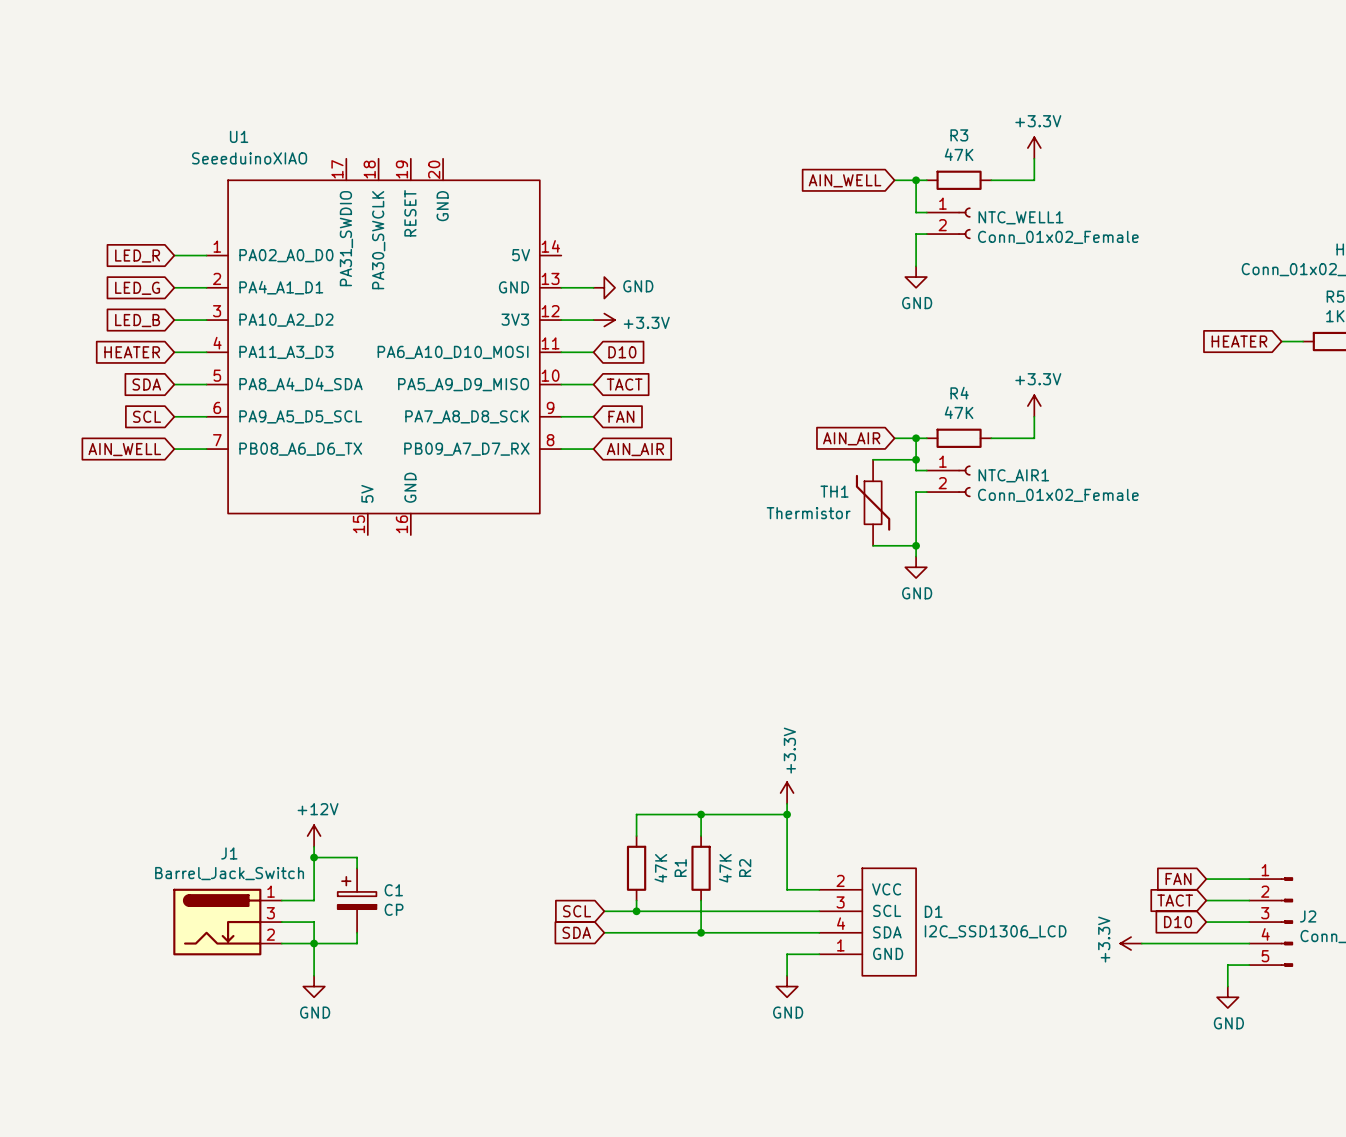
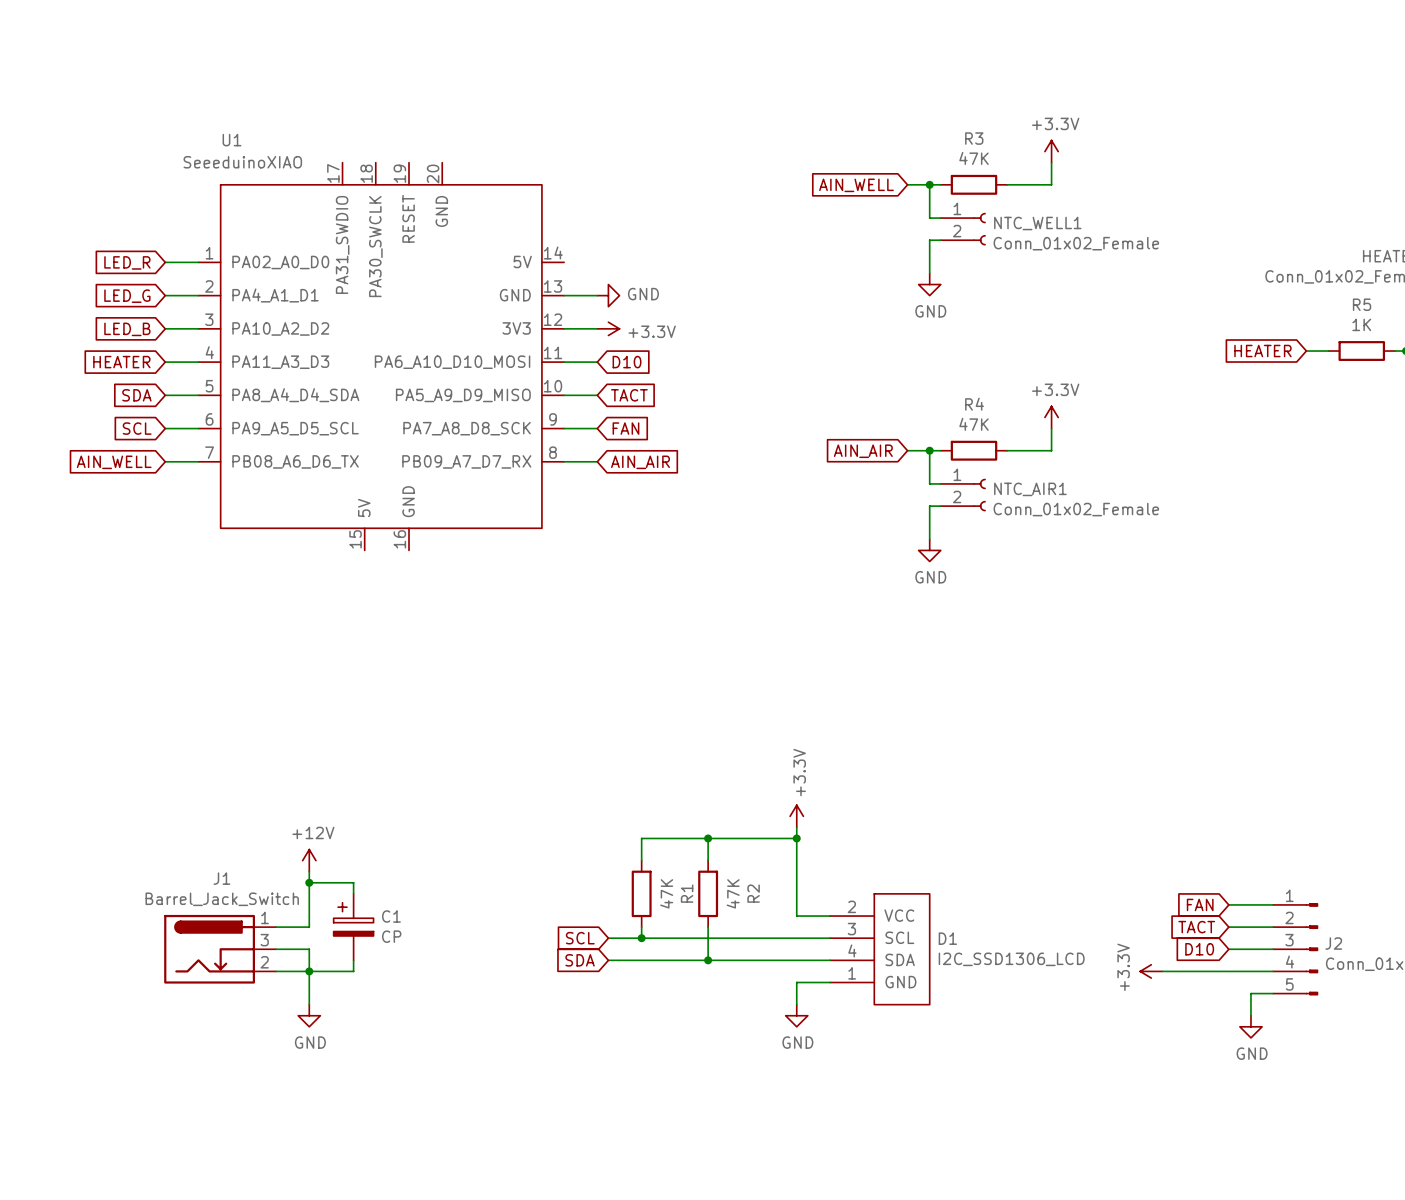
wire: (873, 459) (916, 459) -> none
junction: (916, 459) -> none
TH1: Thermistor (873, 502) -> none
wire: (916, 524) (916, 556) -> none
wire: (873, 545) (916, 545) -> none
junction: (916, 545) -> none
power symbol position: GND (916, 567) -> GND (929, 550)

